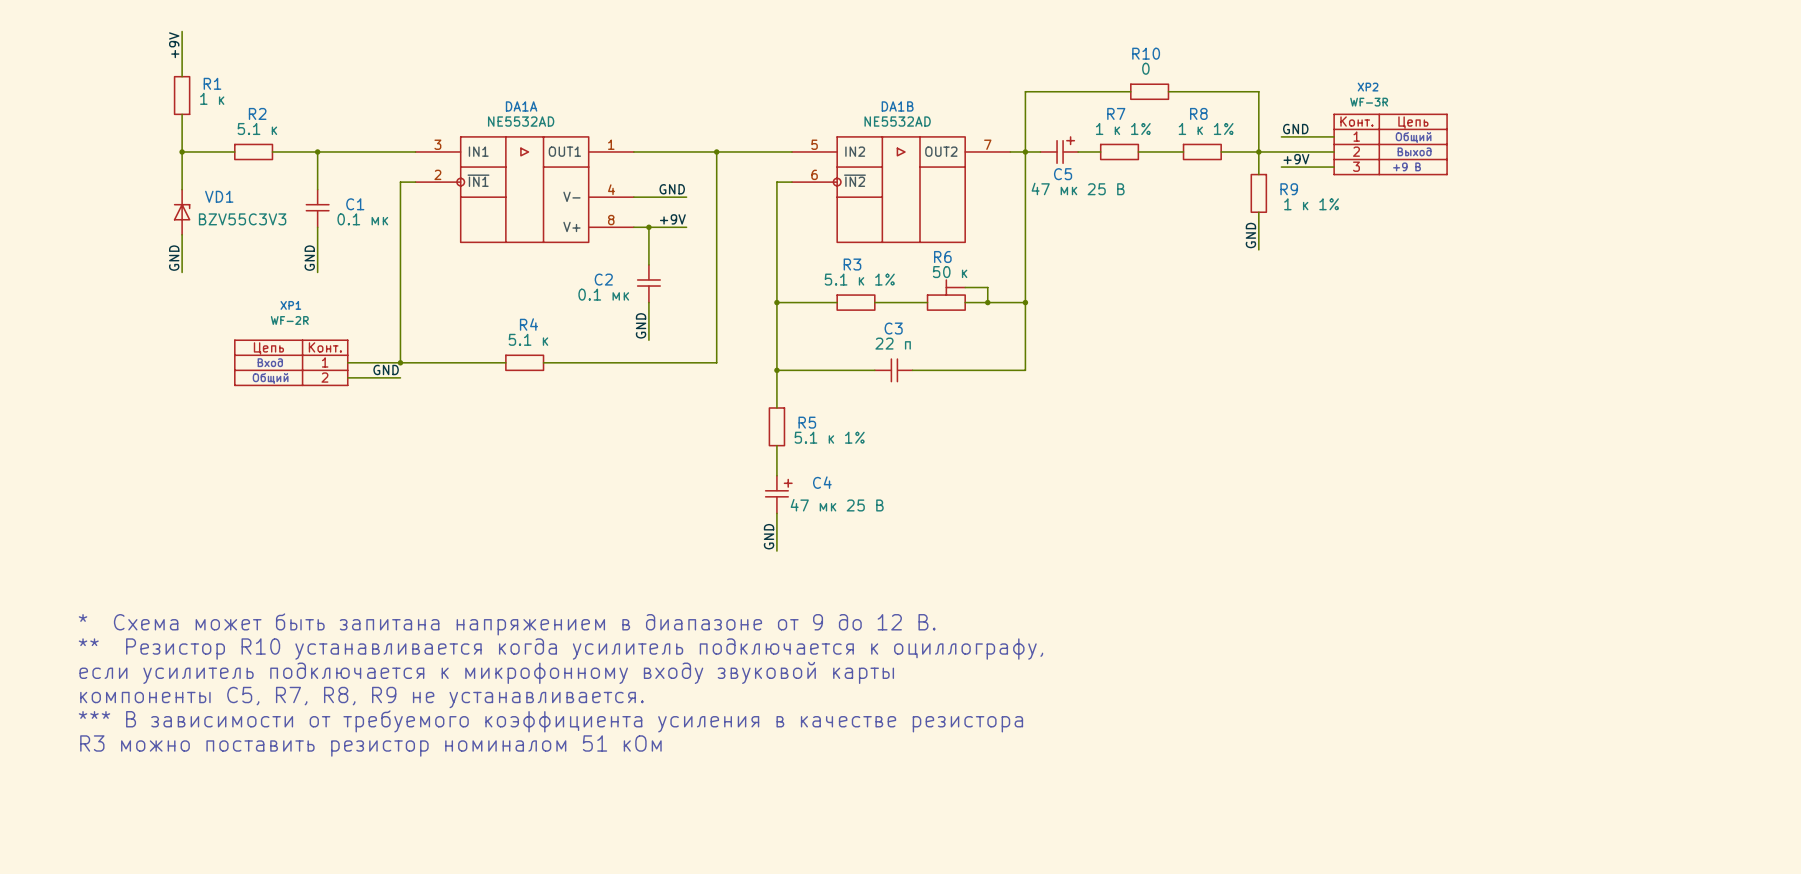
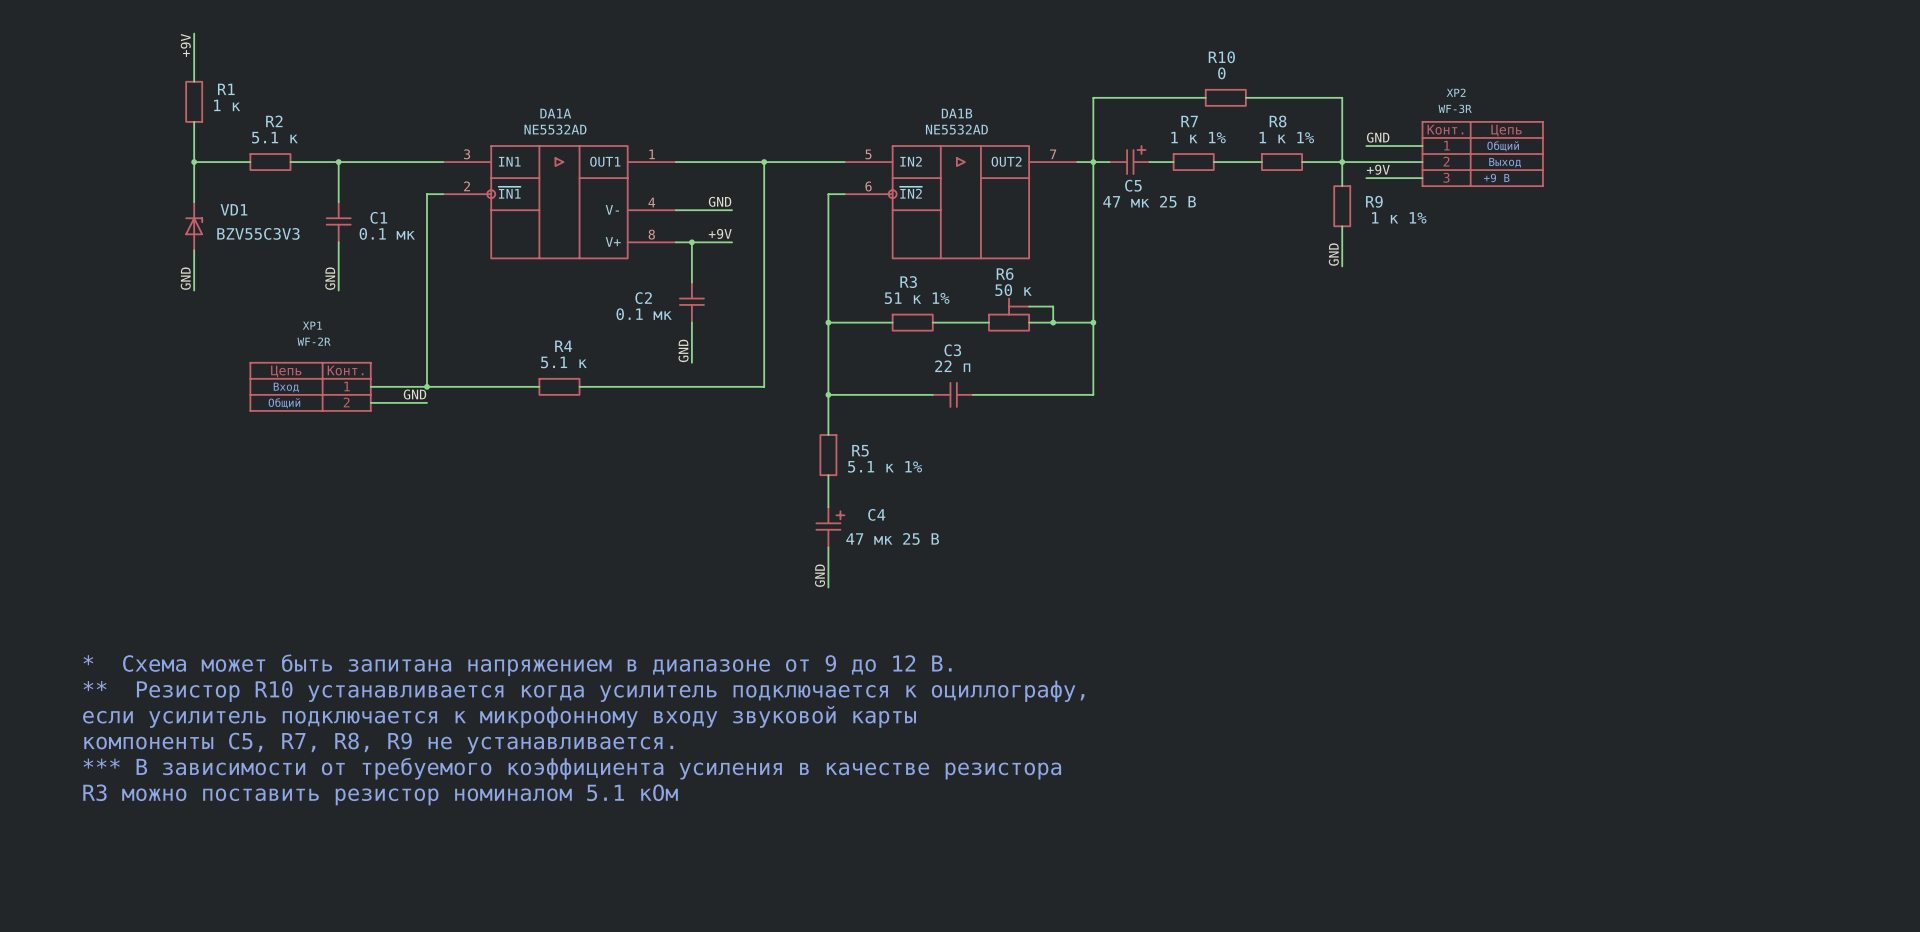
R3 value: 5.1 к 1% (859, 279) -> 51 к 1% (917, 298)
text: R3 можно поставить резистор номиналом 51 кОм (370, 746) -> R3 можно поставить резистор номиналом 5.1 кОм (380, 794)

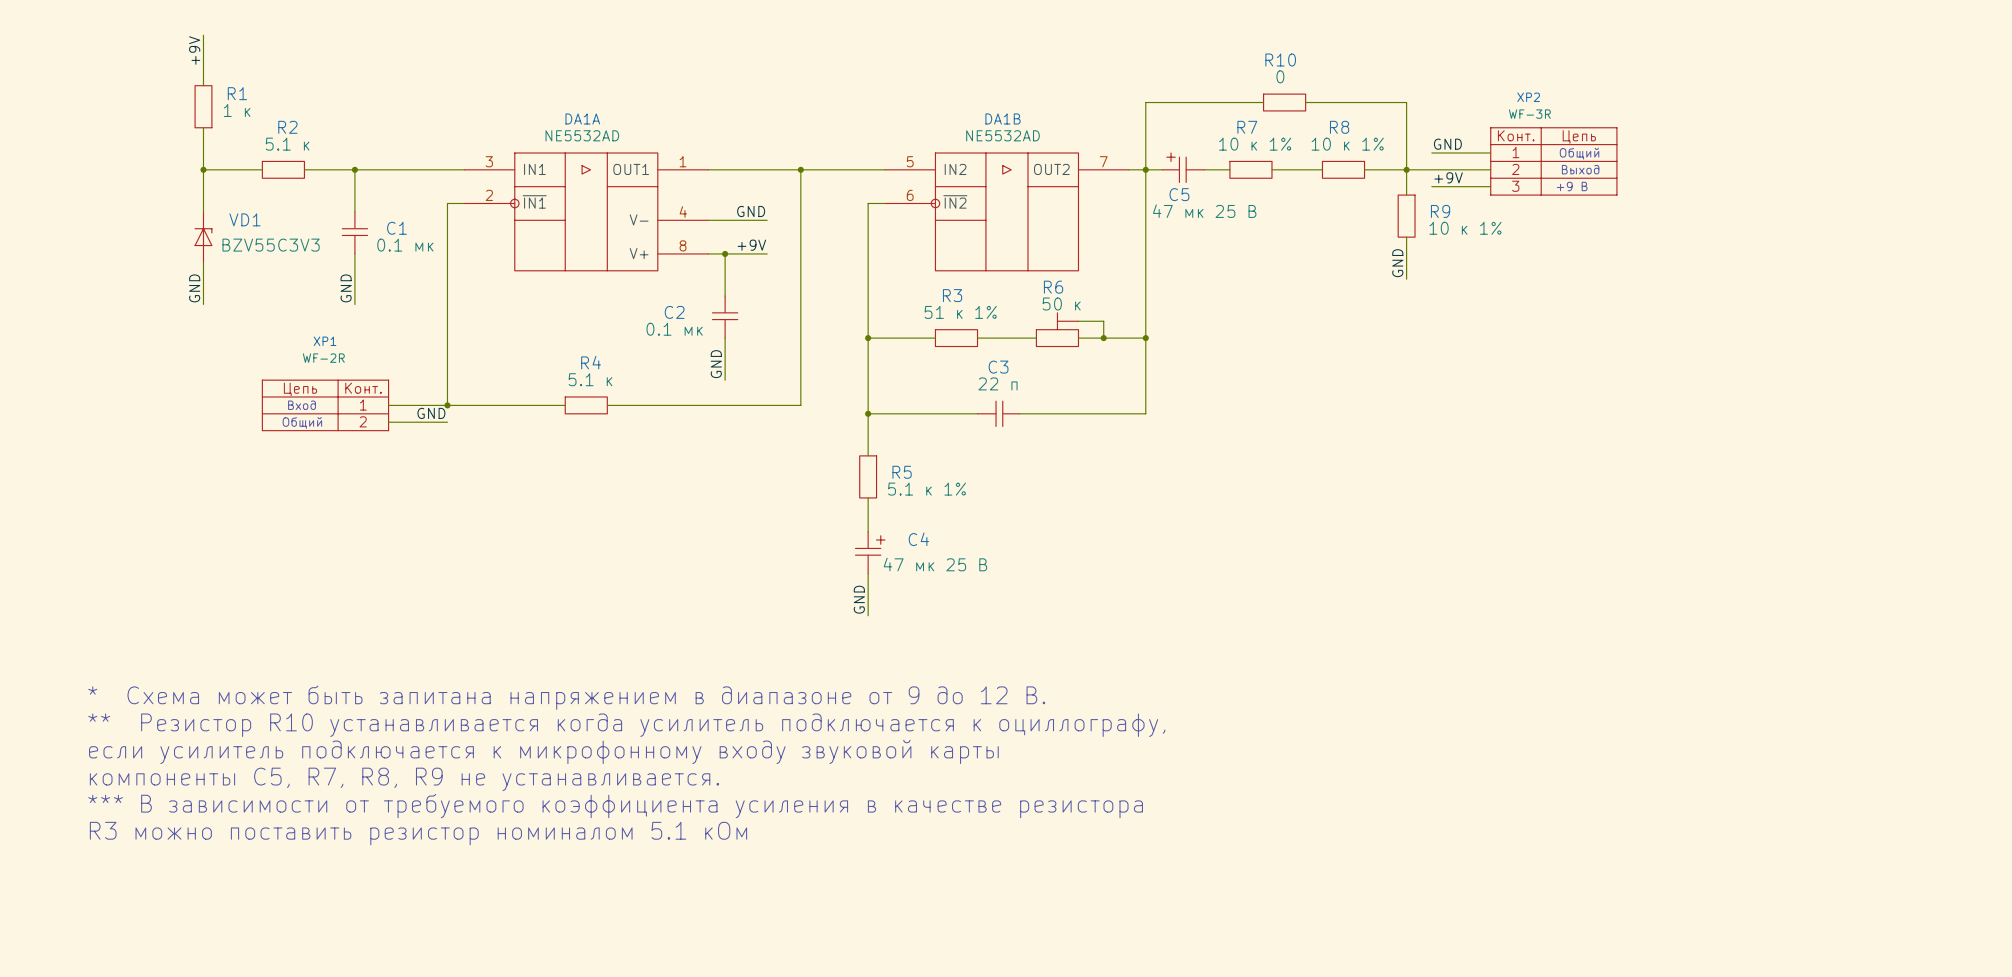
R7 value: 1 к 1% (1198, 137) -> 10 к 1% (1255, 144)
R8 value: 1 к 1% (1286, 137) -> 10 к 1% (1347, 144)
C5 flip: as is (1136, 160) -> left-right (1176, 167)
R9 value: 1 к 1% (1399, 217) -> 10 к 1% (1465, 228)

